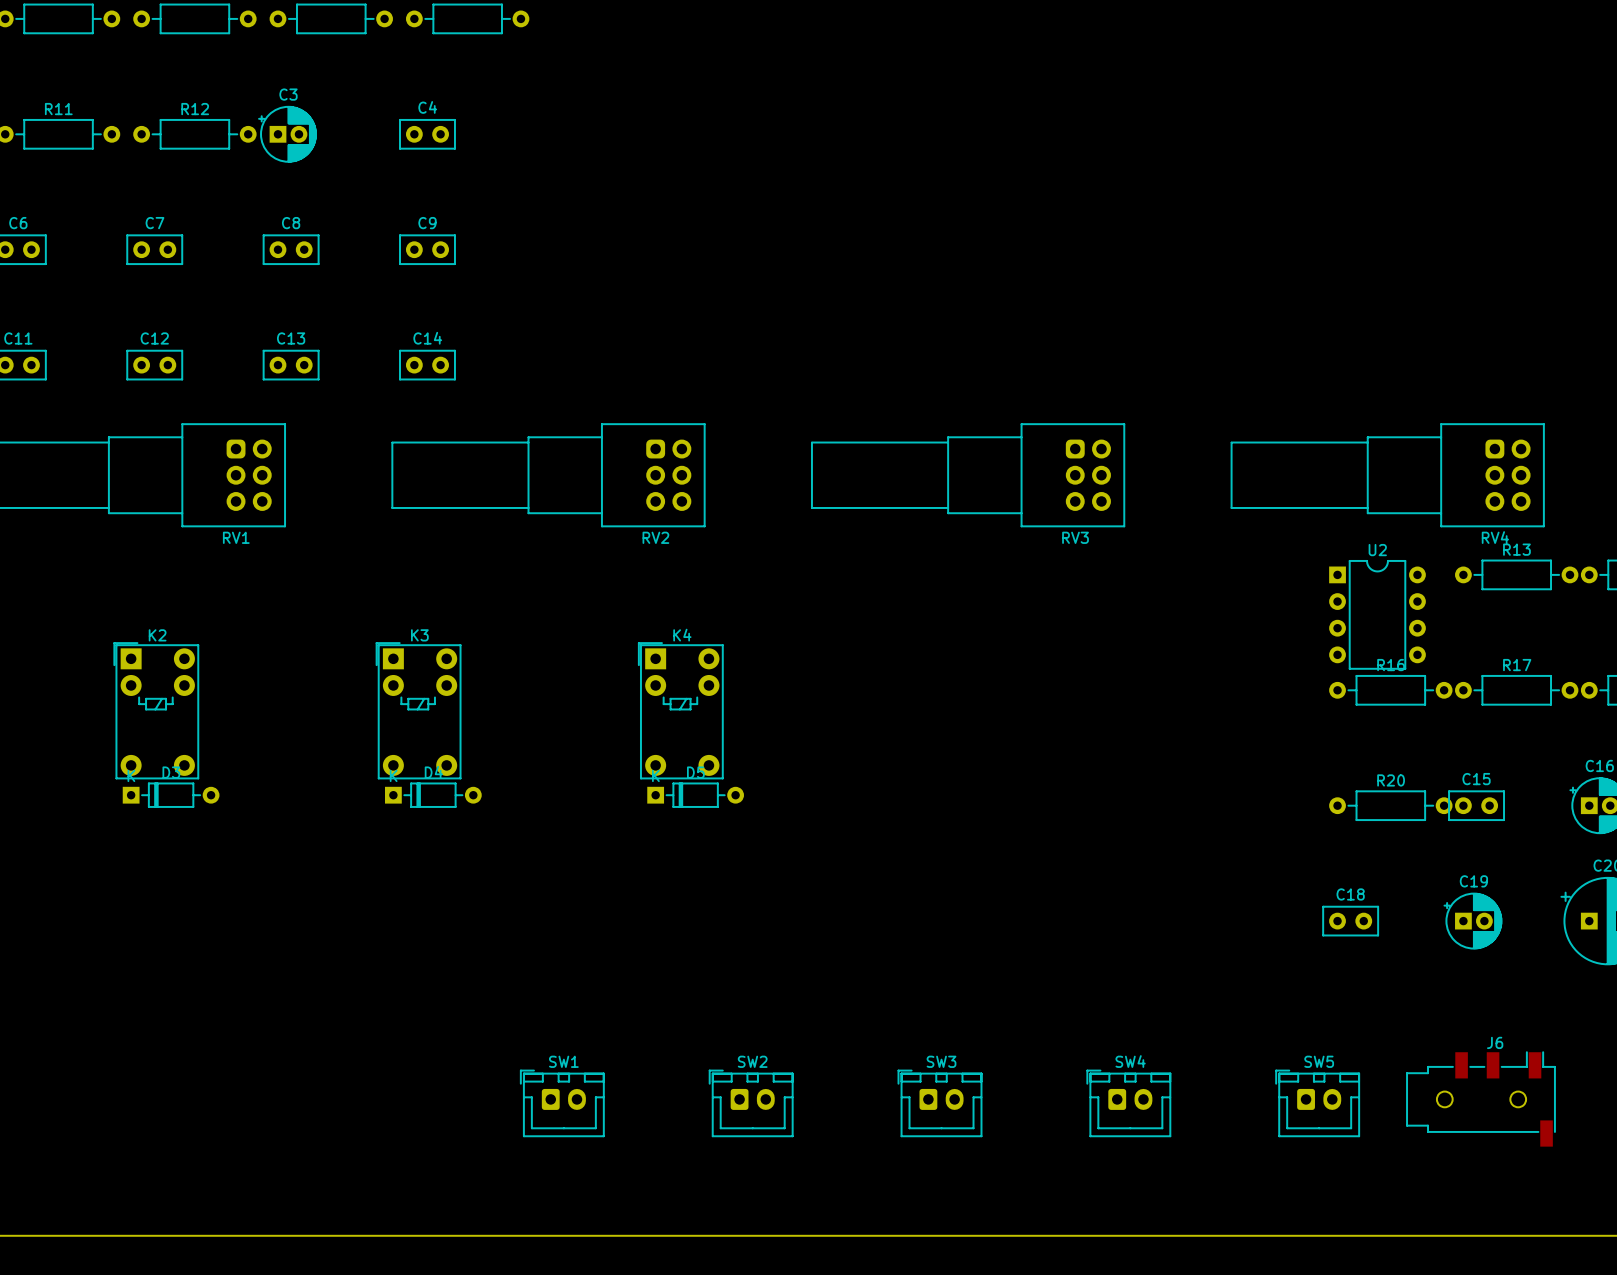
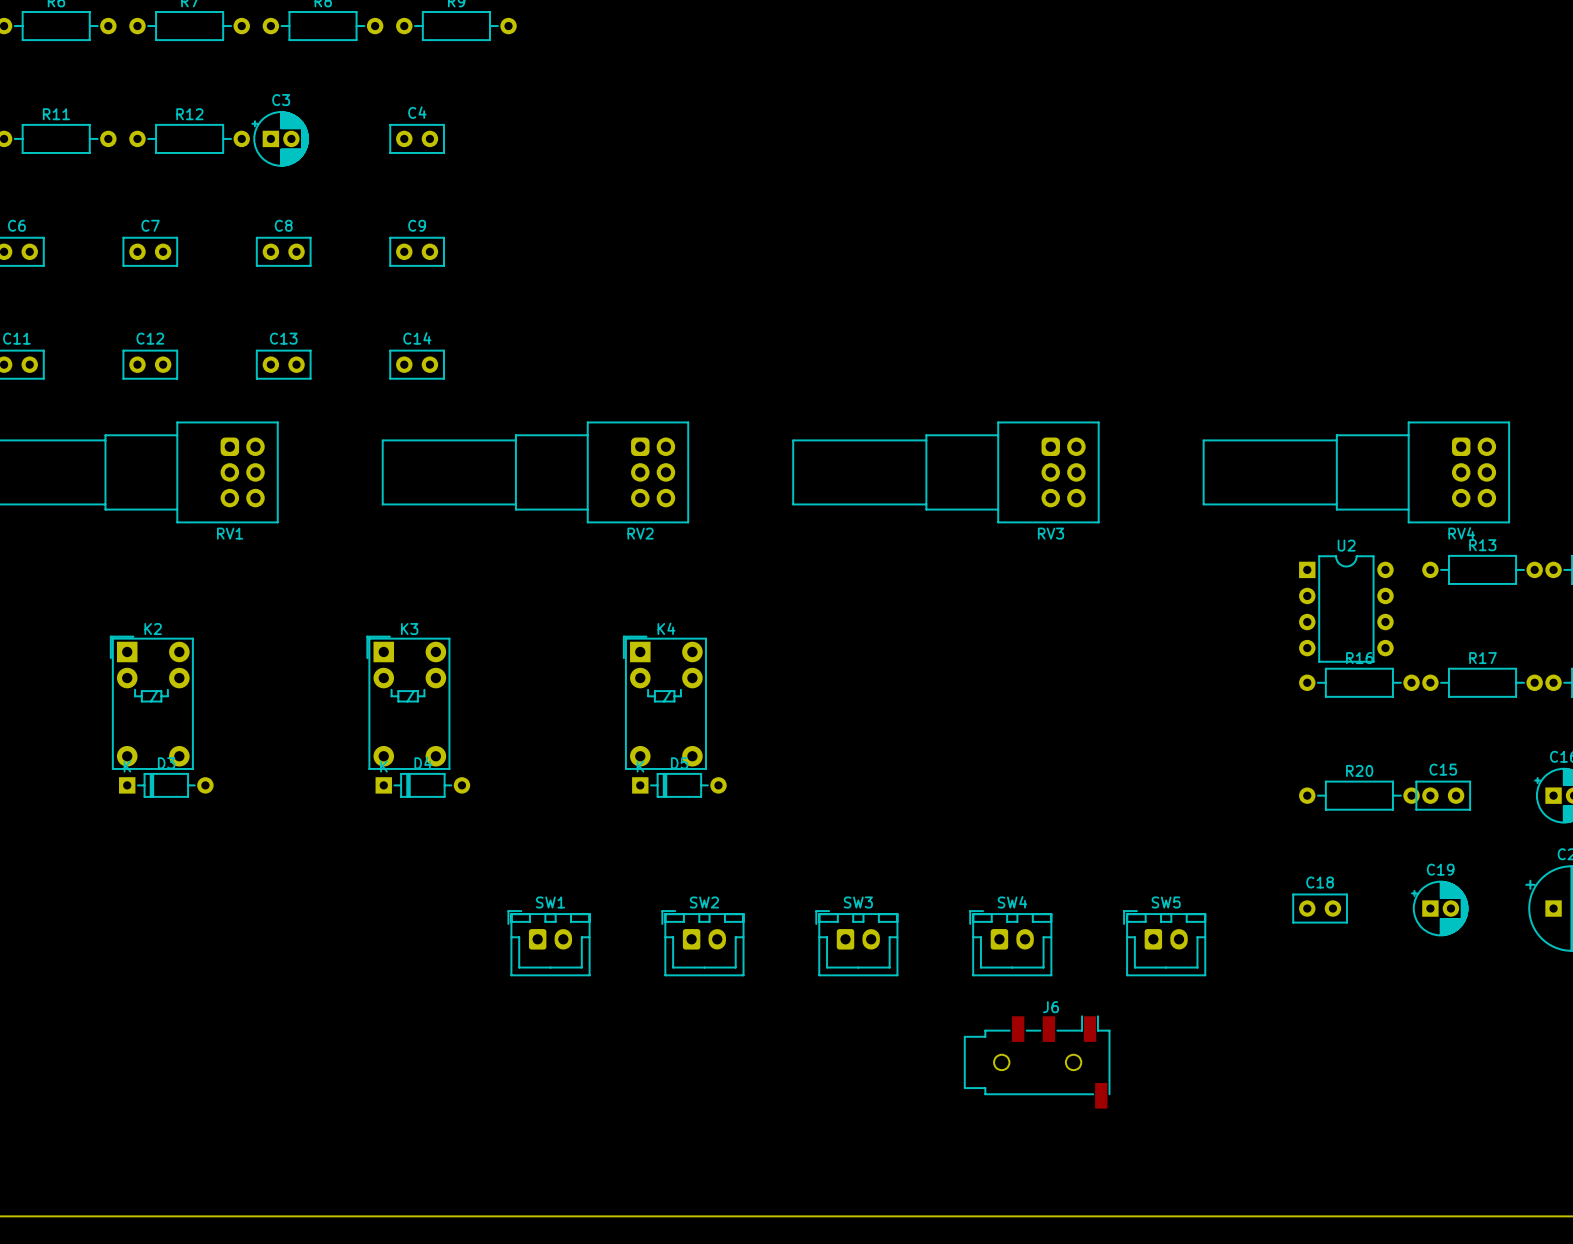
J6 position: (1480, 1099) -> (1037, 1062)
SW1 position: (562, 1103) -> (549, 943)
SW2 position: (751, 1103) -> (702, 943)
SW3 position: (940, 1103) -> (856, 943)
SW4 position: (1128, 1103) -> (1010, 943)
SW5 position: (1317, 1103) -> (1164, 943)

